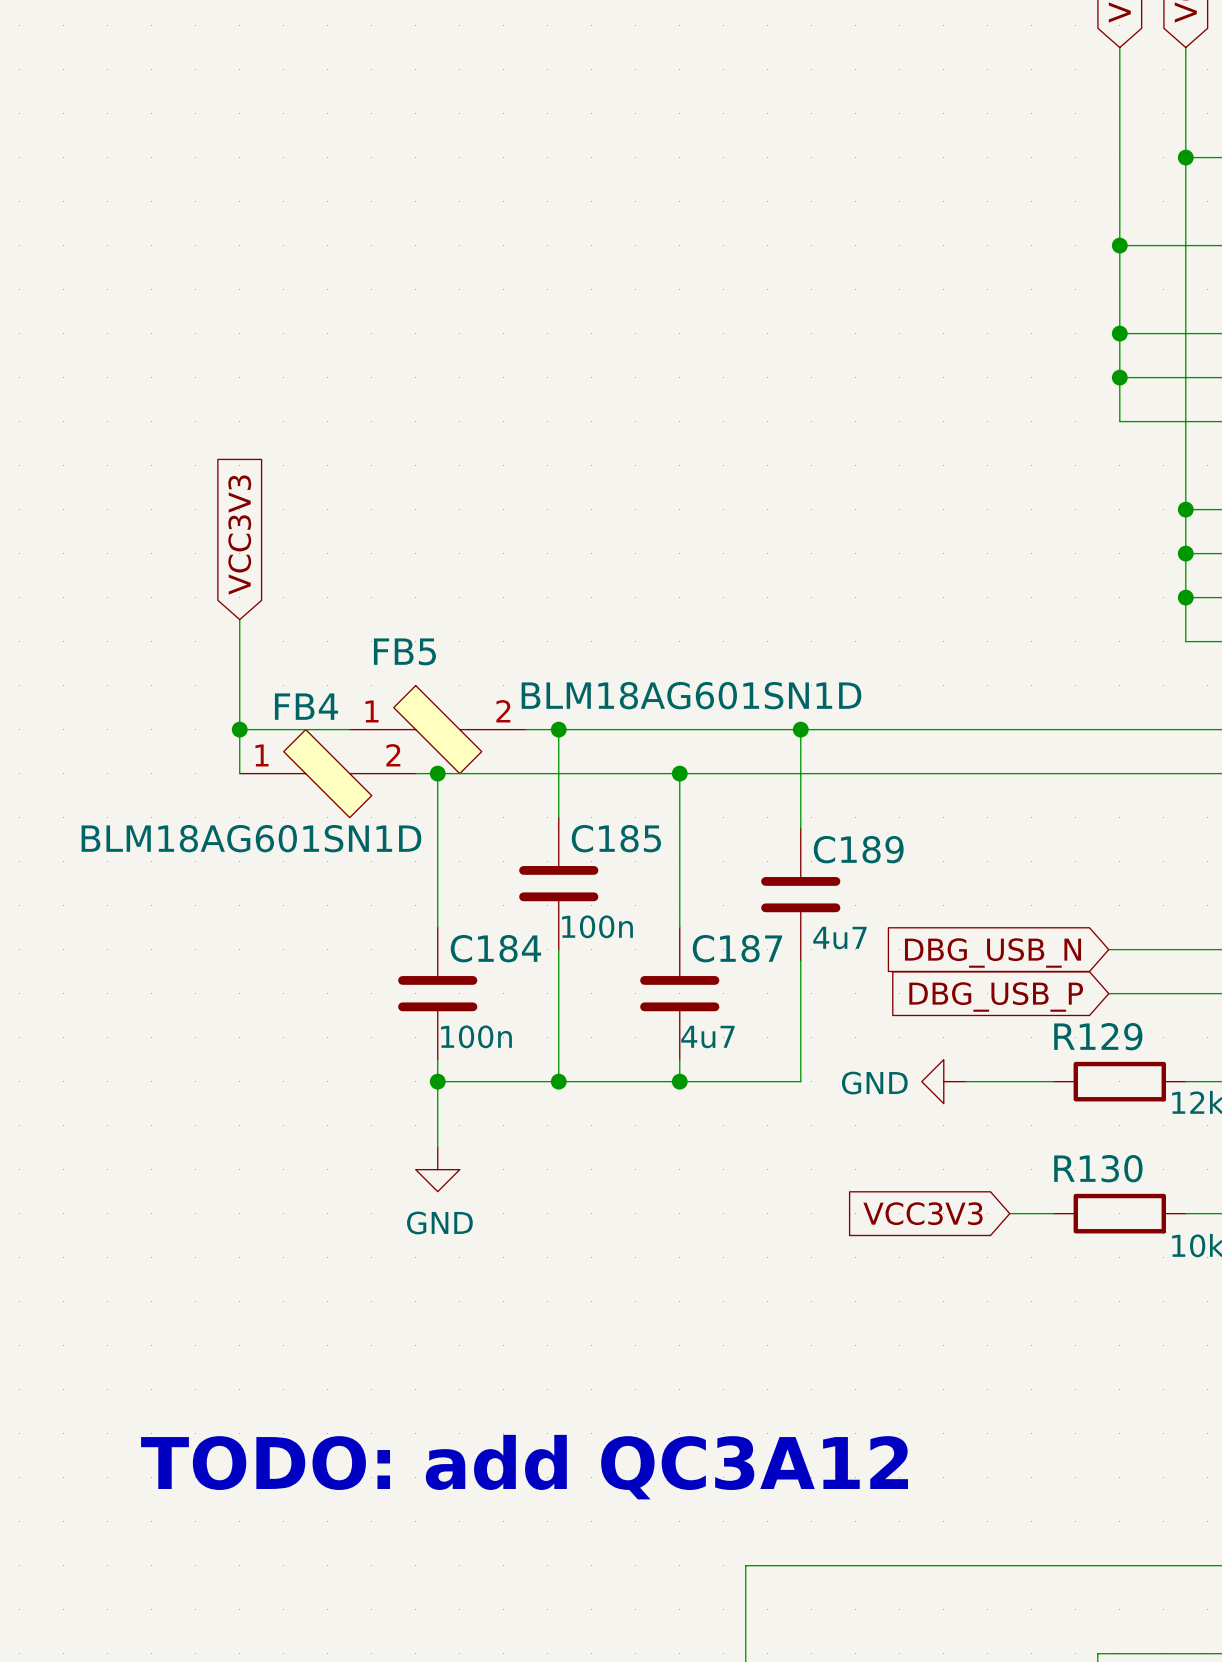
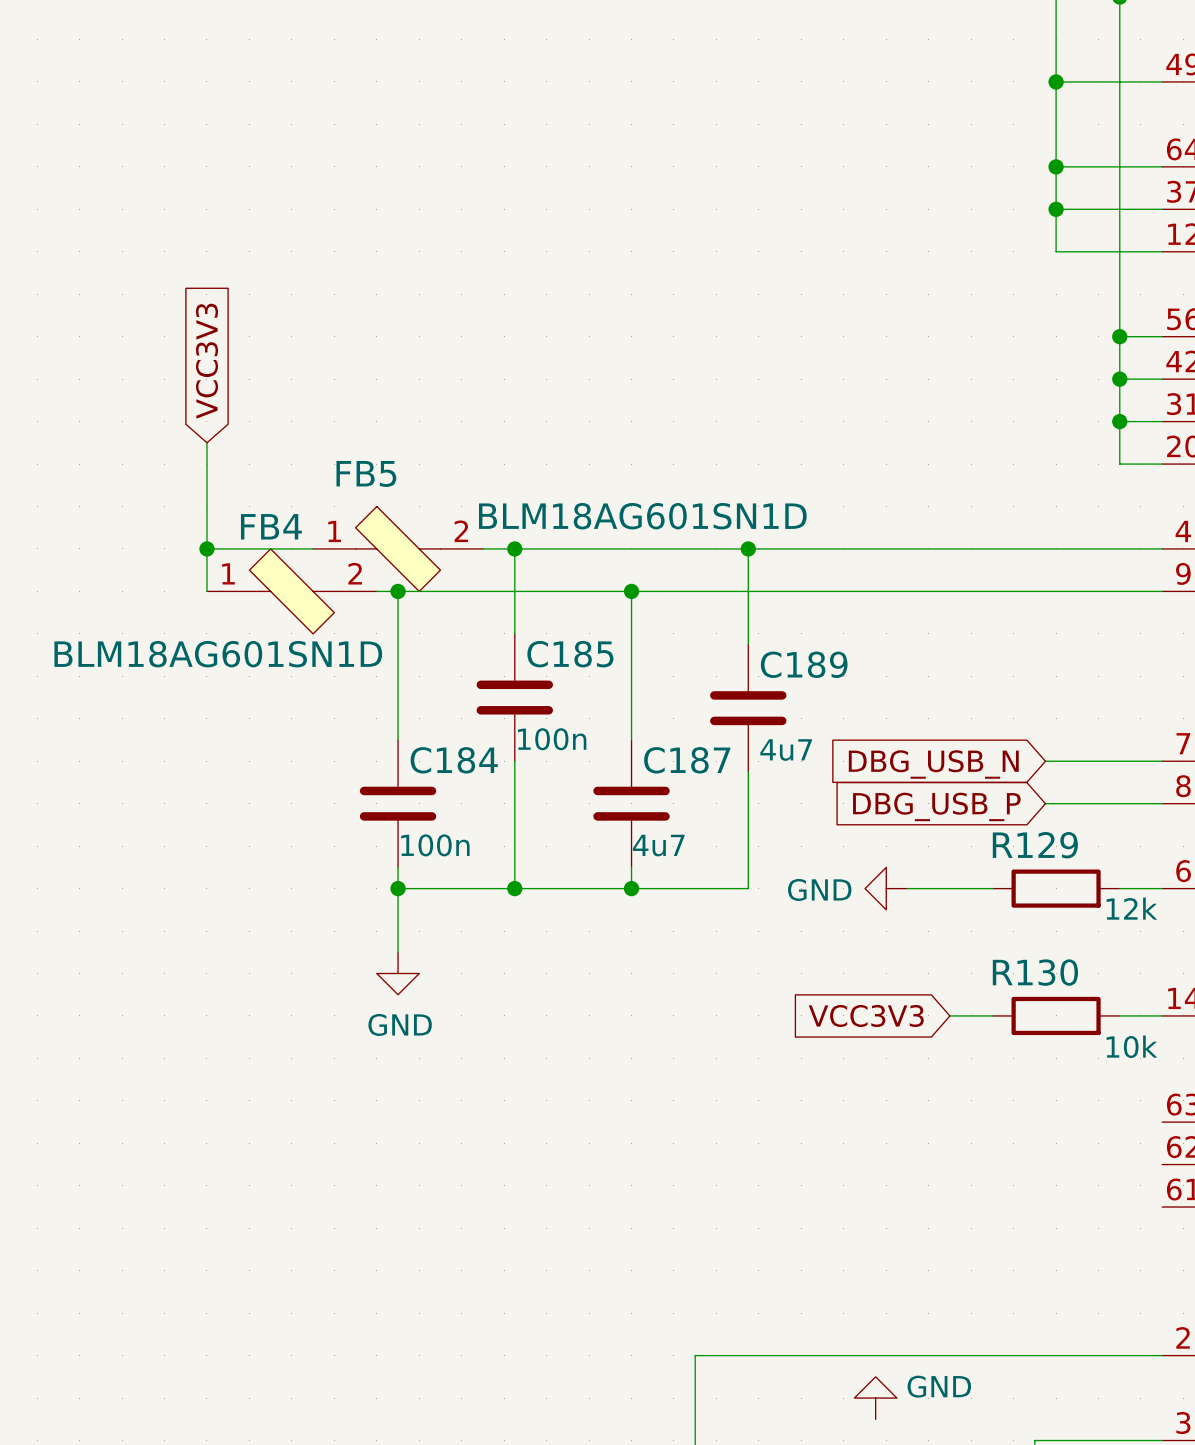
text: TODO: add QC3A12 (524, 1467) -> none
power symbol: none -> GND (875, 1398)

